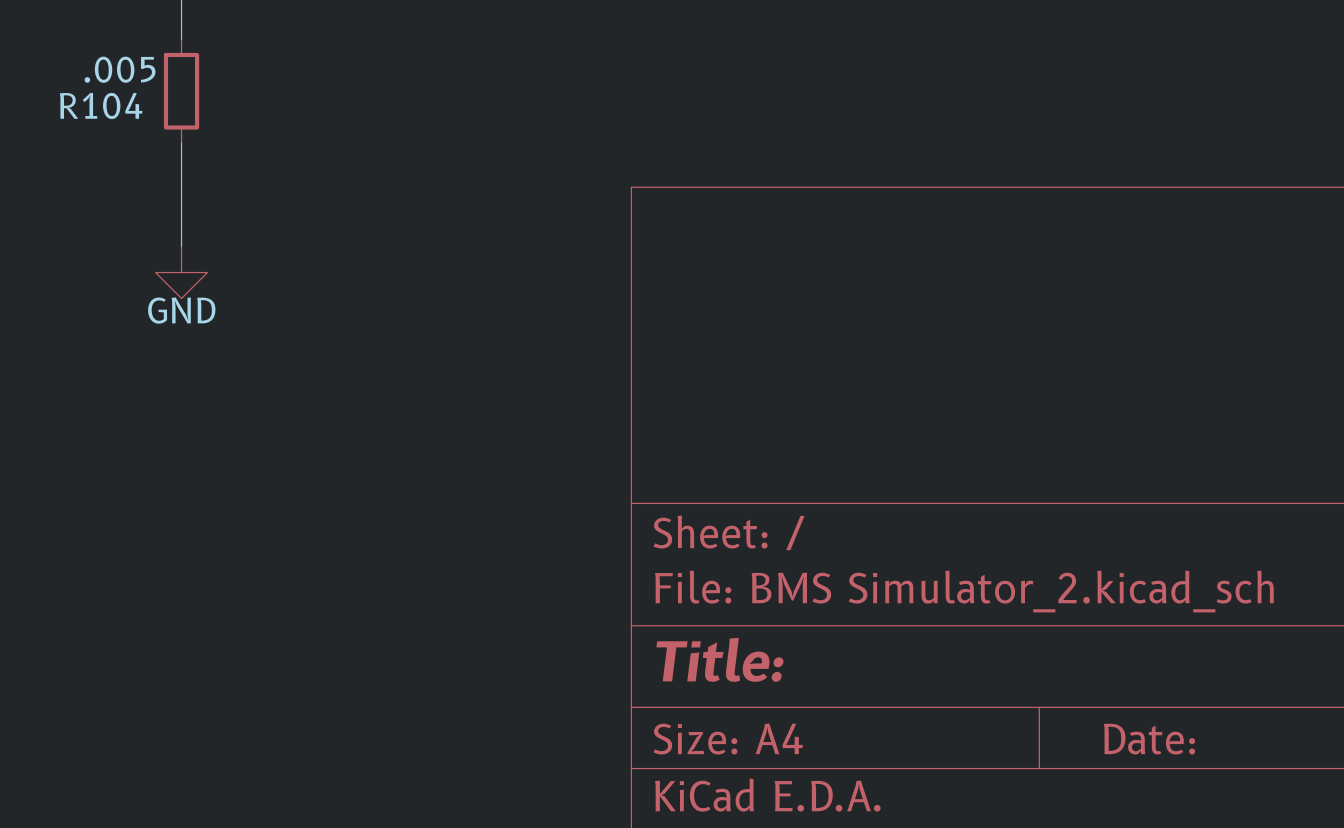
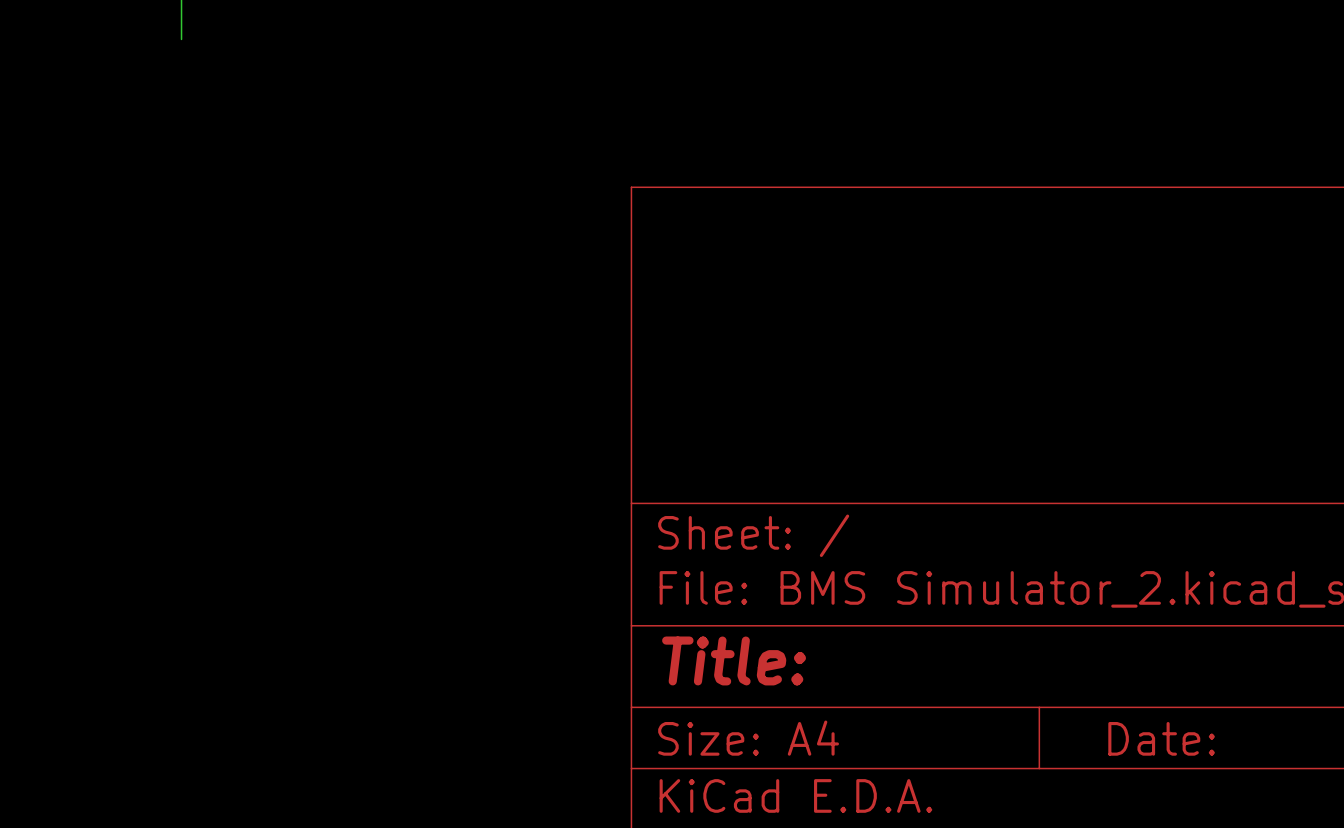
R104: .005 (181, 91) -> none
wire: (181, 143) (181, 246) -> none
power symbol: GND (181, 272) -> none

